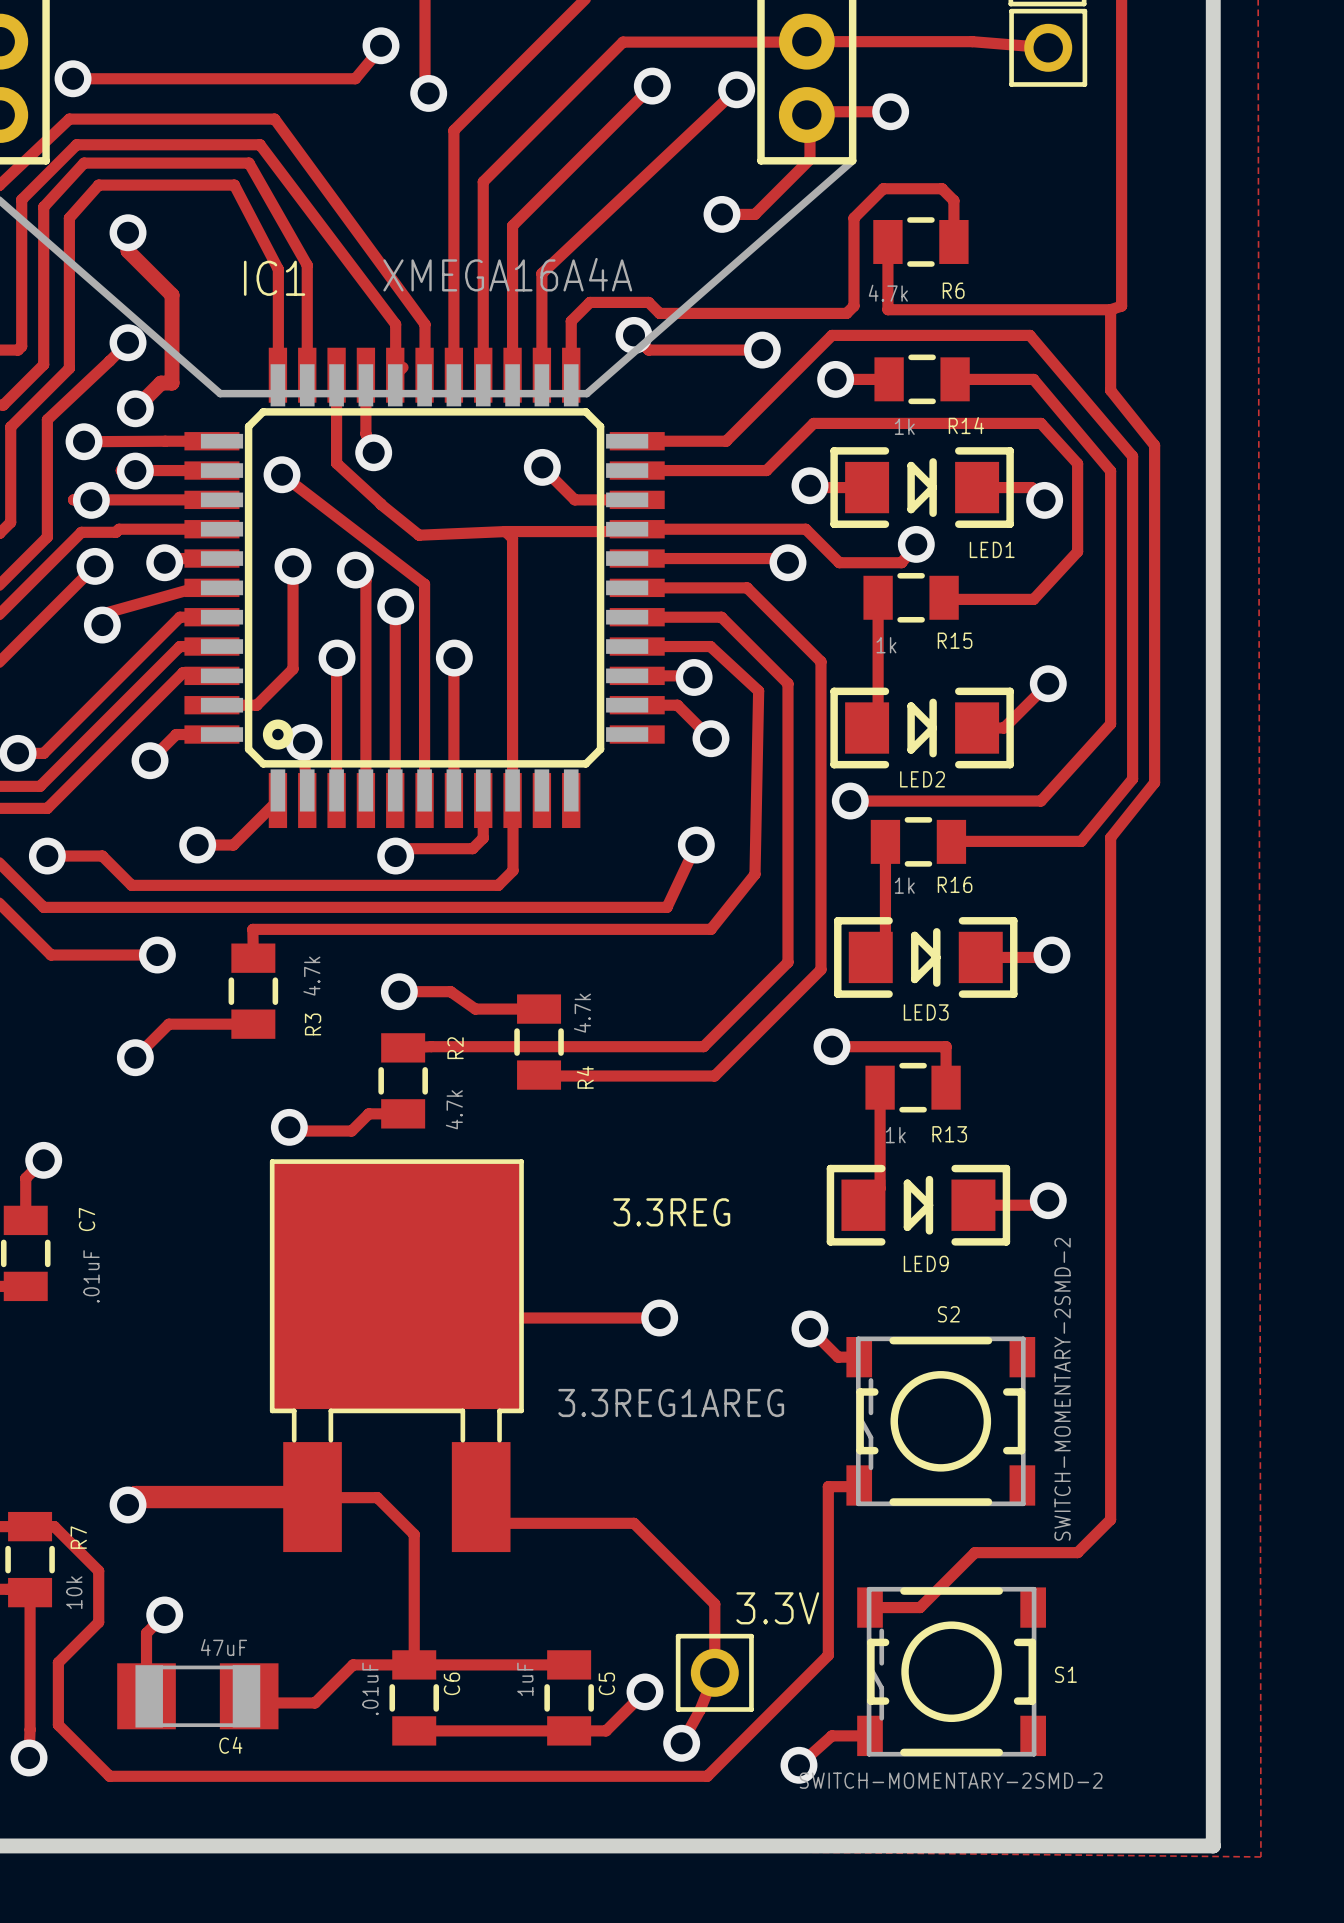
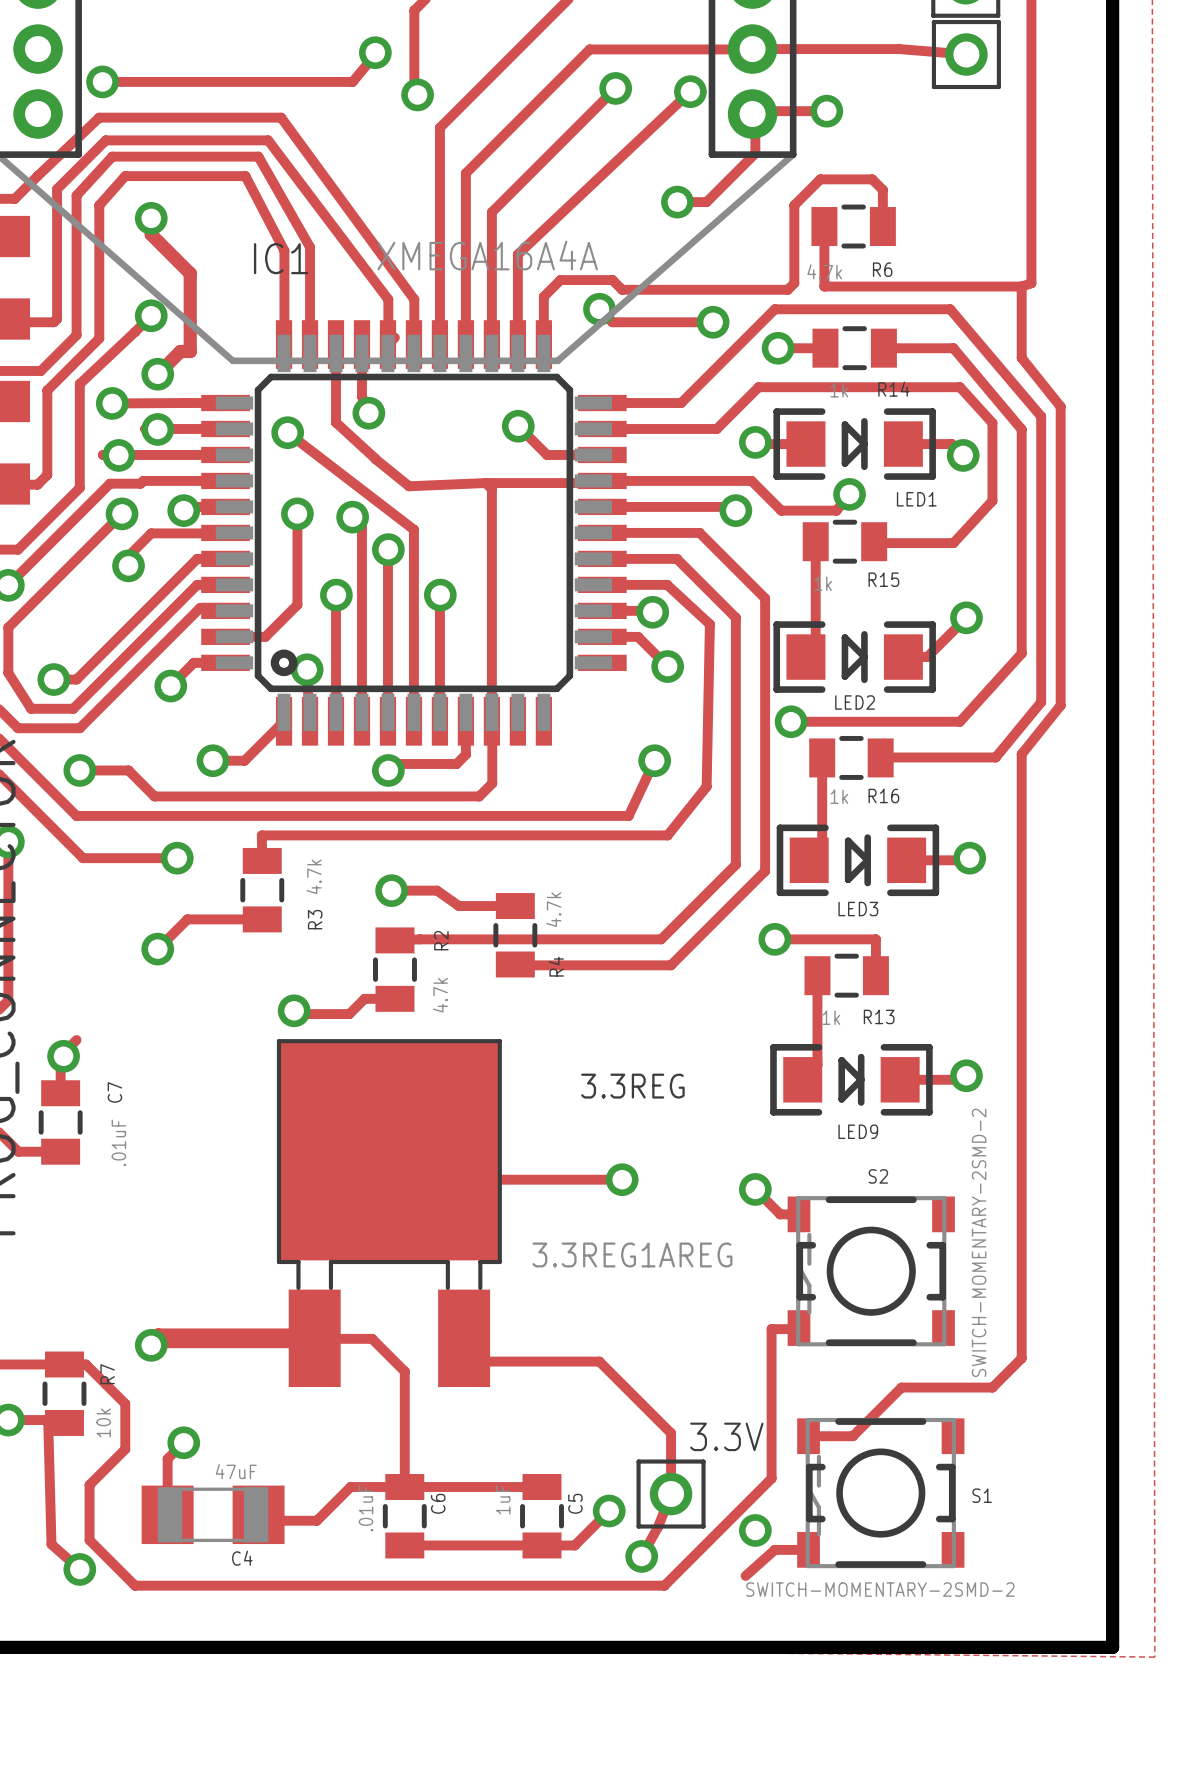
track: (194, 588) (102, 614) -> (209, 533) (151, 533) (128, 556)
via position: (43, 1160) -> (63, 1056)
track: (8, 1589) (30, 1592) (29, 1757) -> (45, 1420) (48, 1422) (51, 1544) (79, 1569)
via position: (29, 1757) -> (79, 1569)
via position: (798, 1765) -> (755, 1530)

